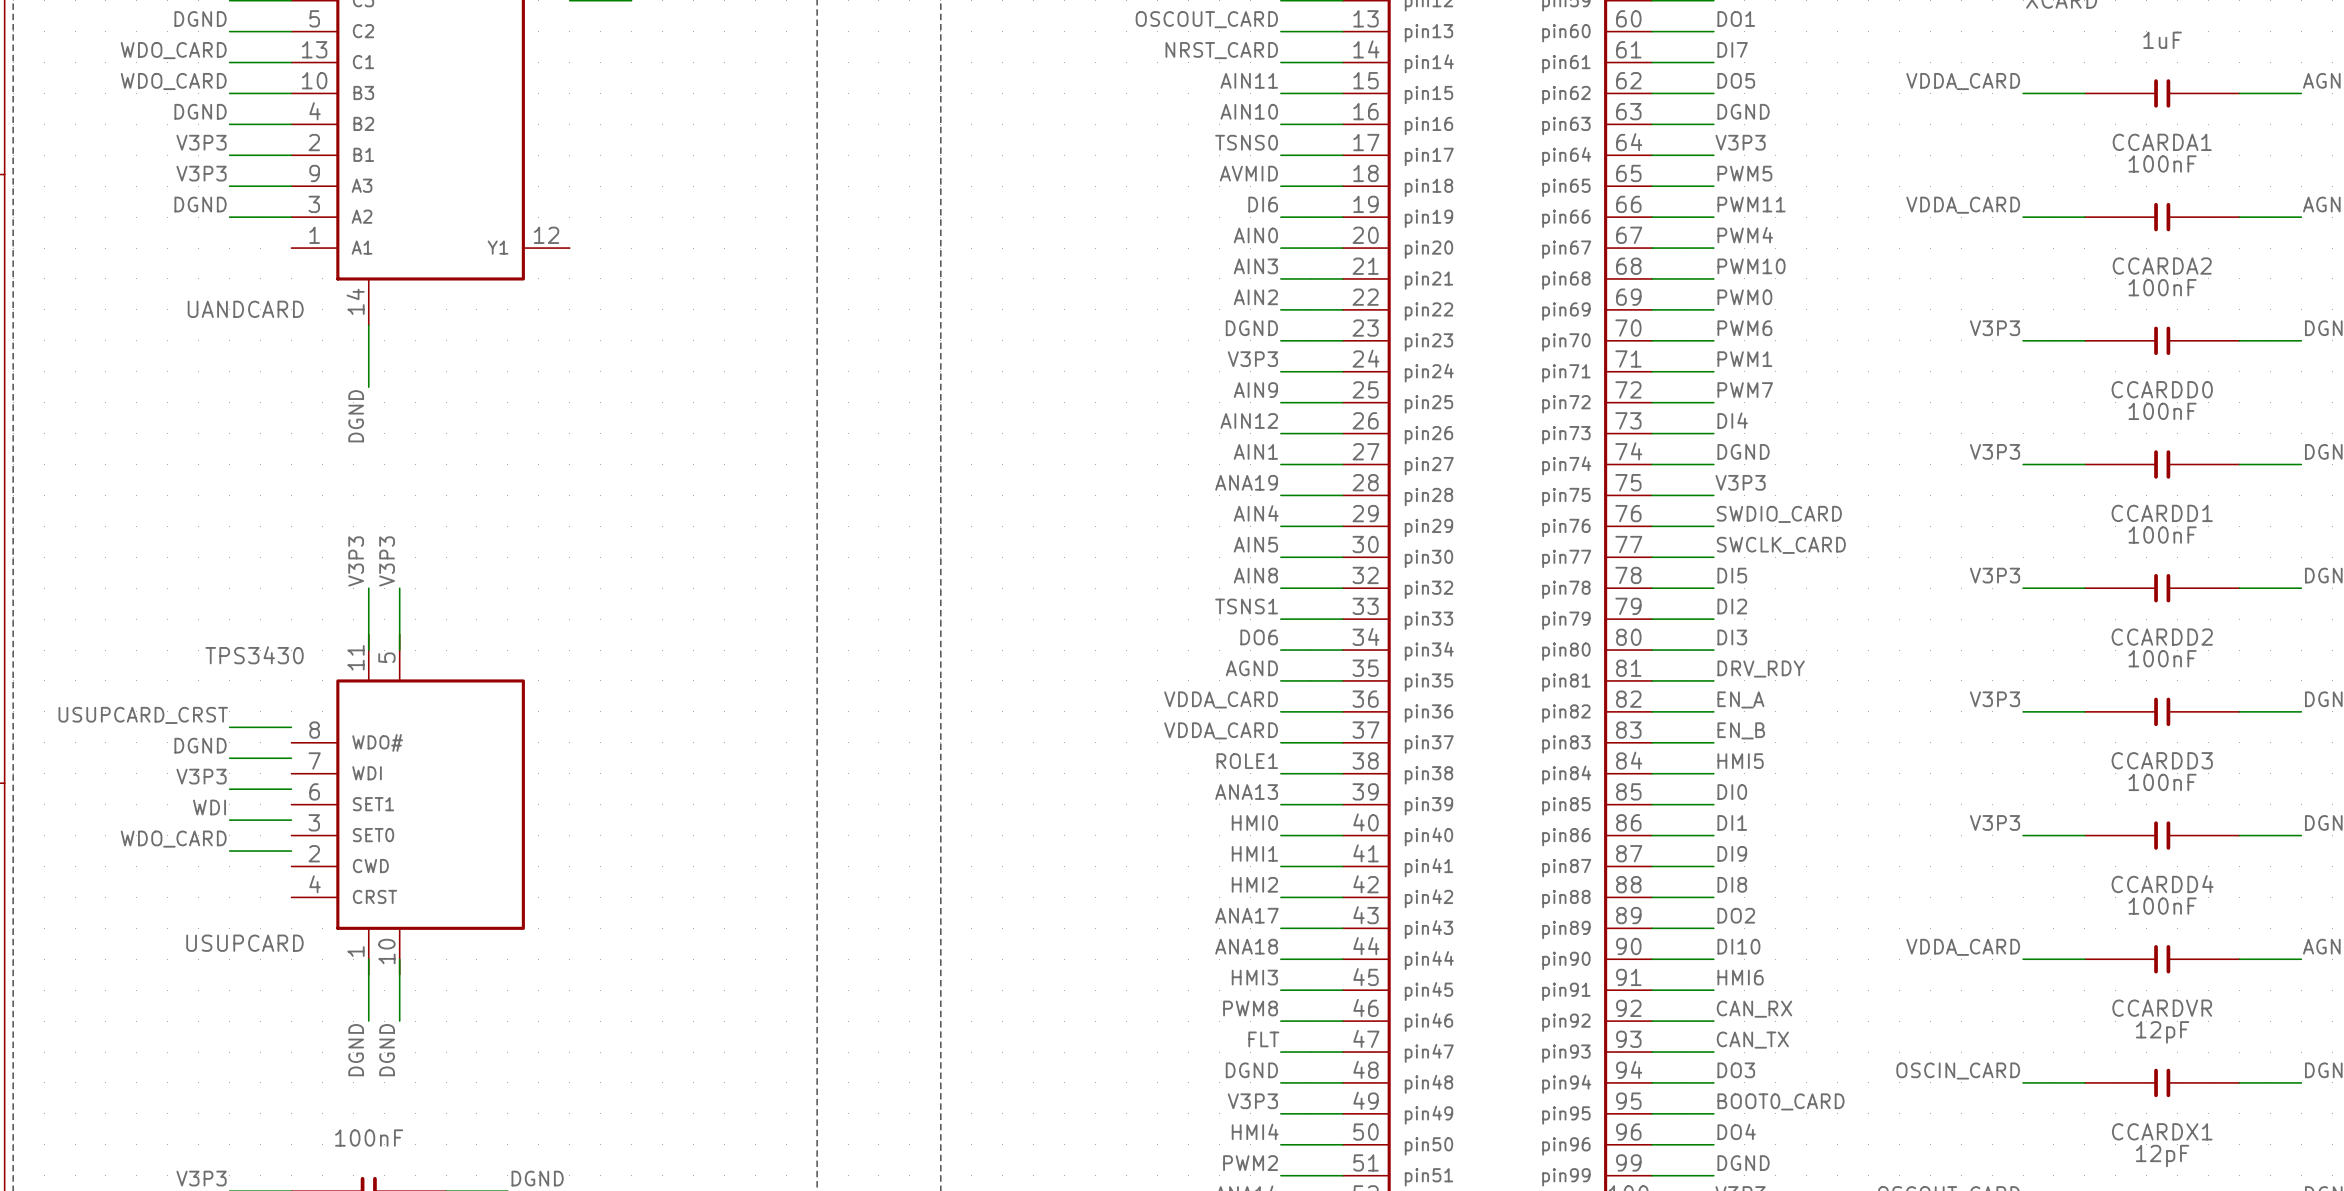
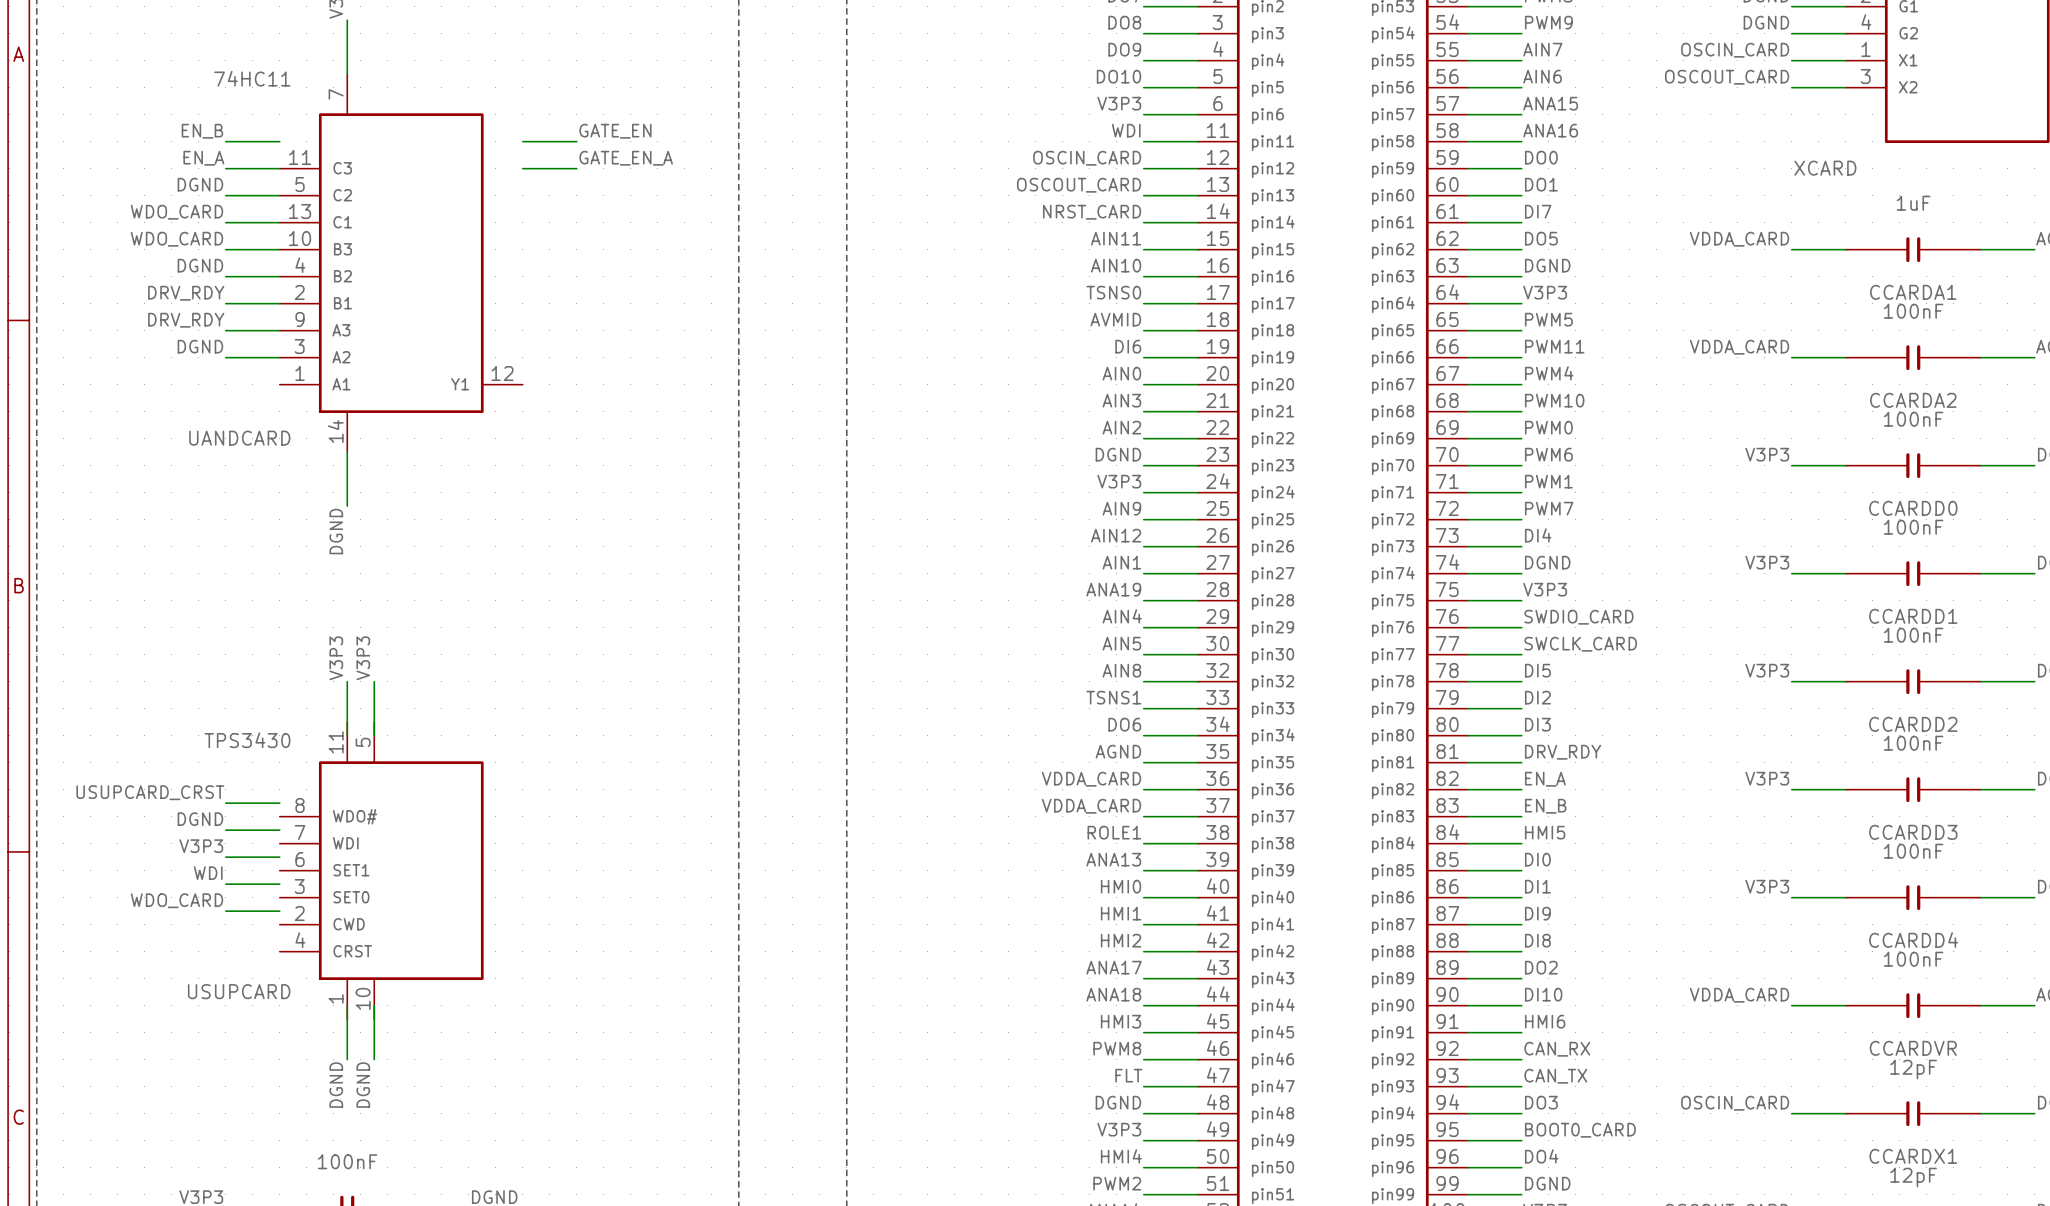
label: V3P3 (201, 142) -> DRV_RDY (186, 293)
label: V3P3 (201, 173) -> DRV_RDY (186, 320)

